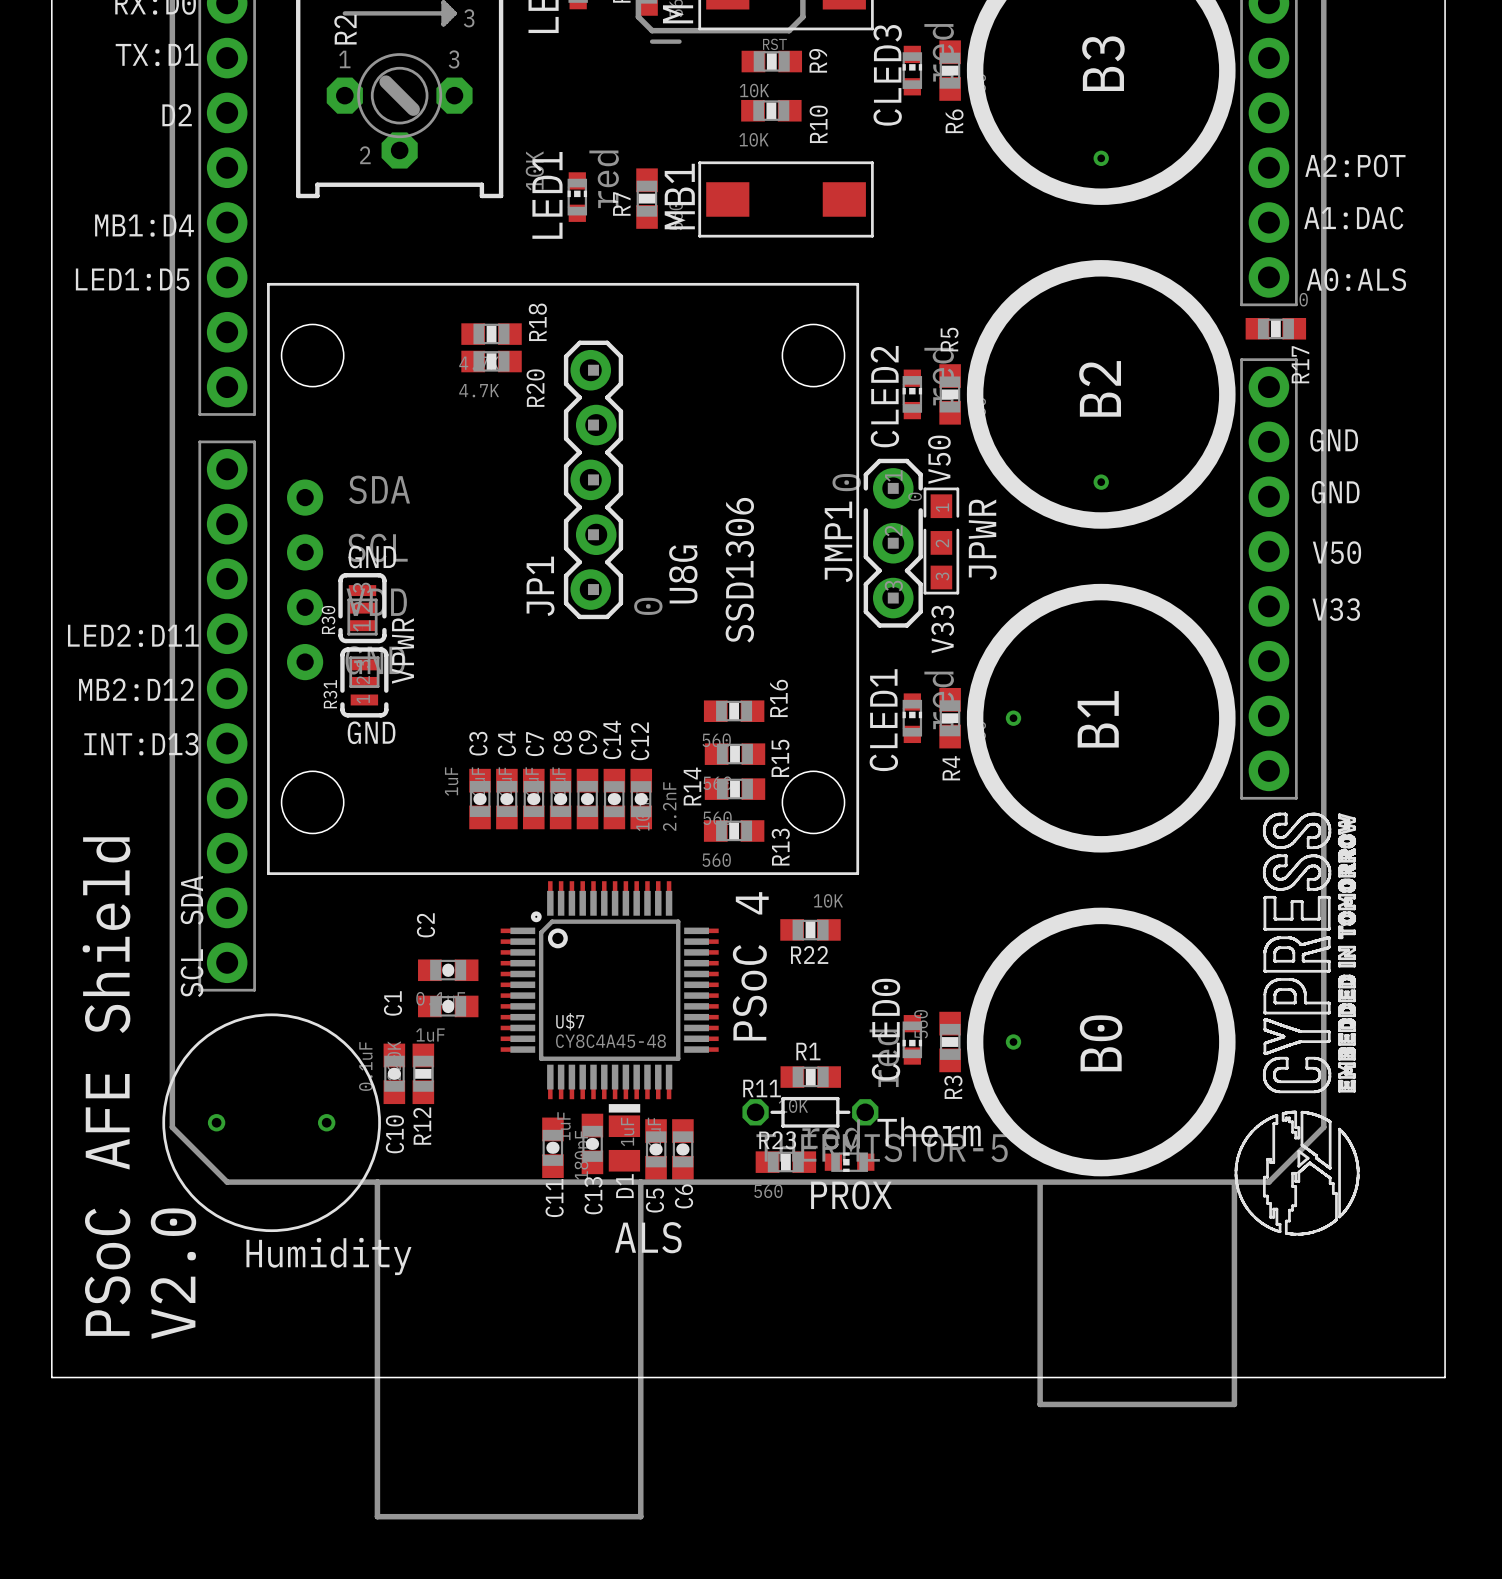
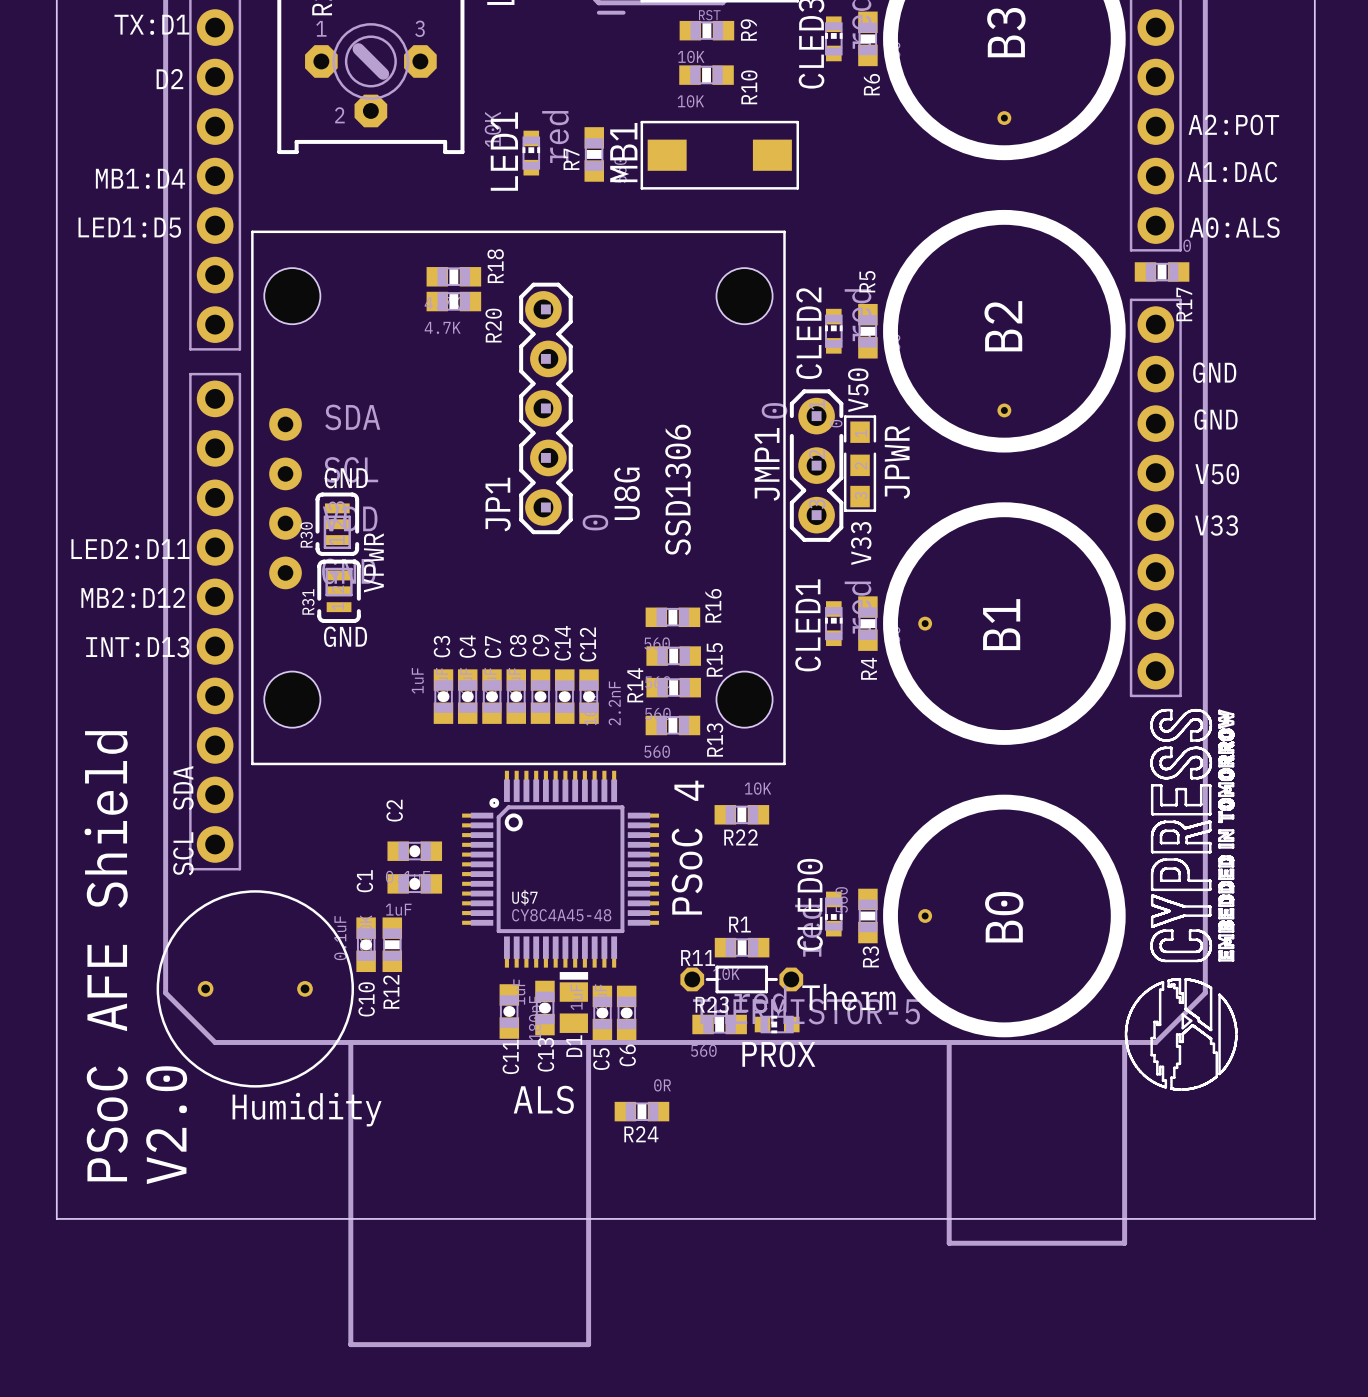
text position: ALS (648, 1237) -> ALS (543, 1099)
R24: none -> 0R (641, 1111)

